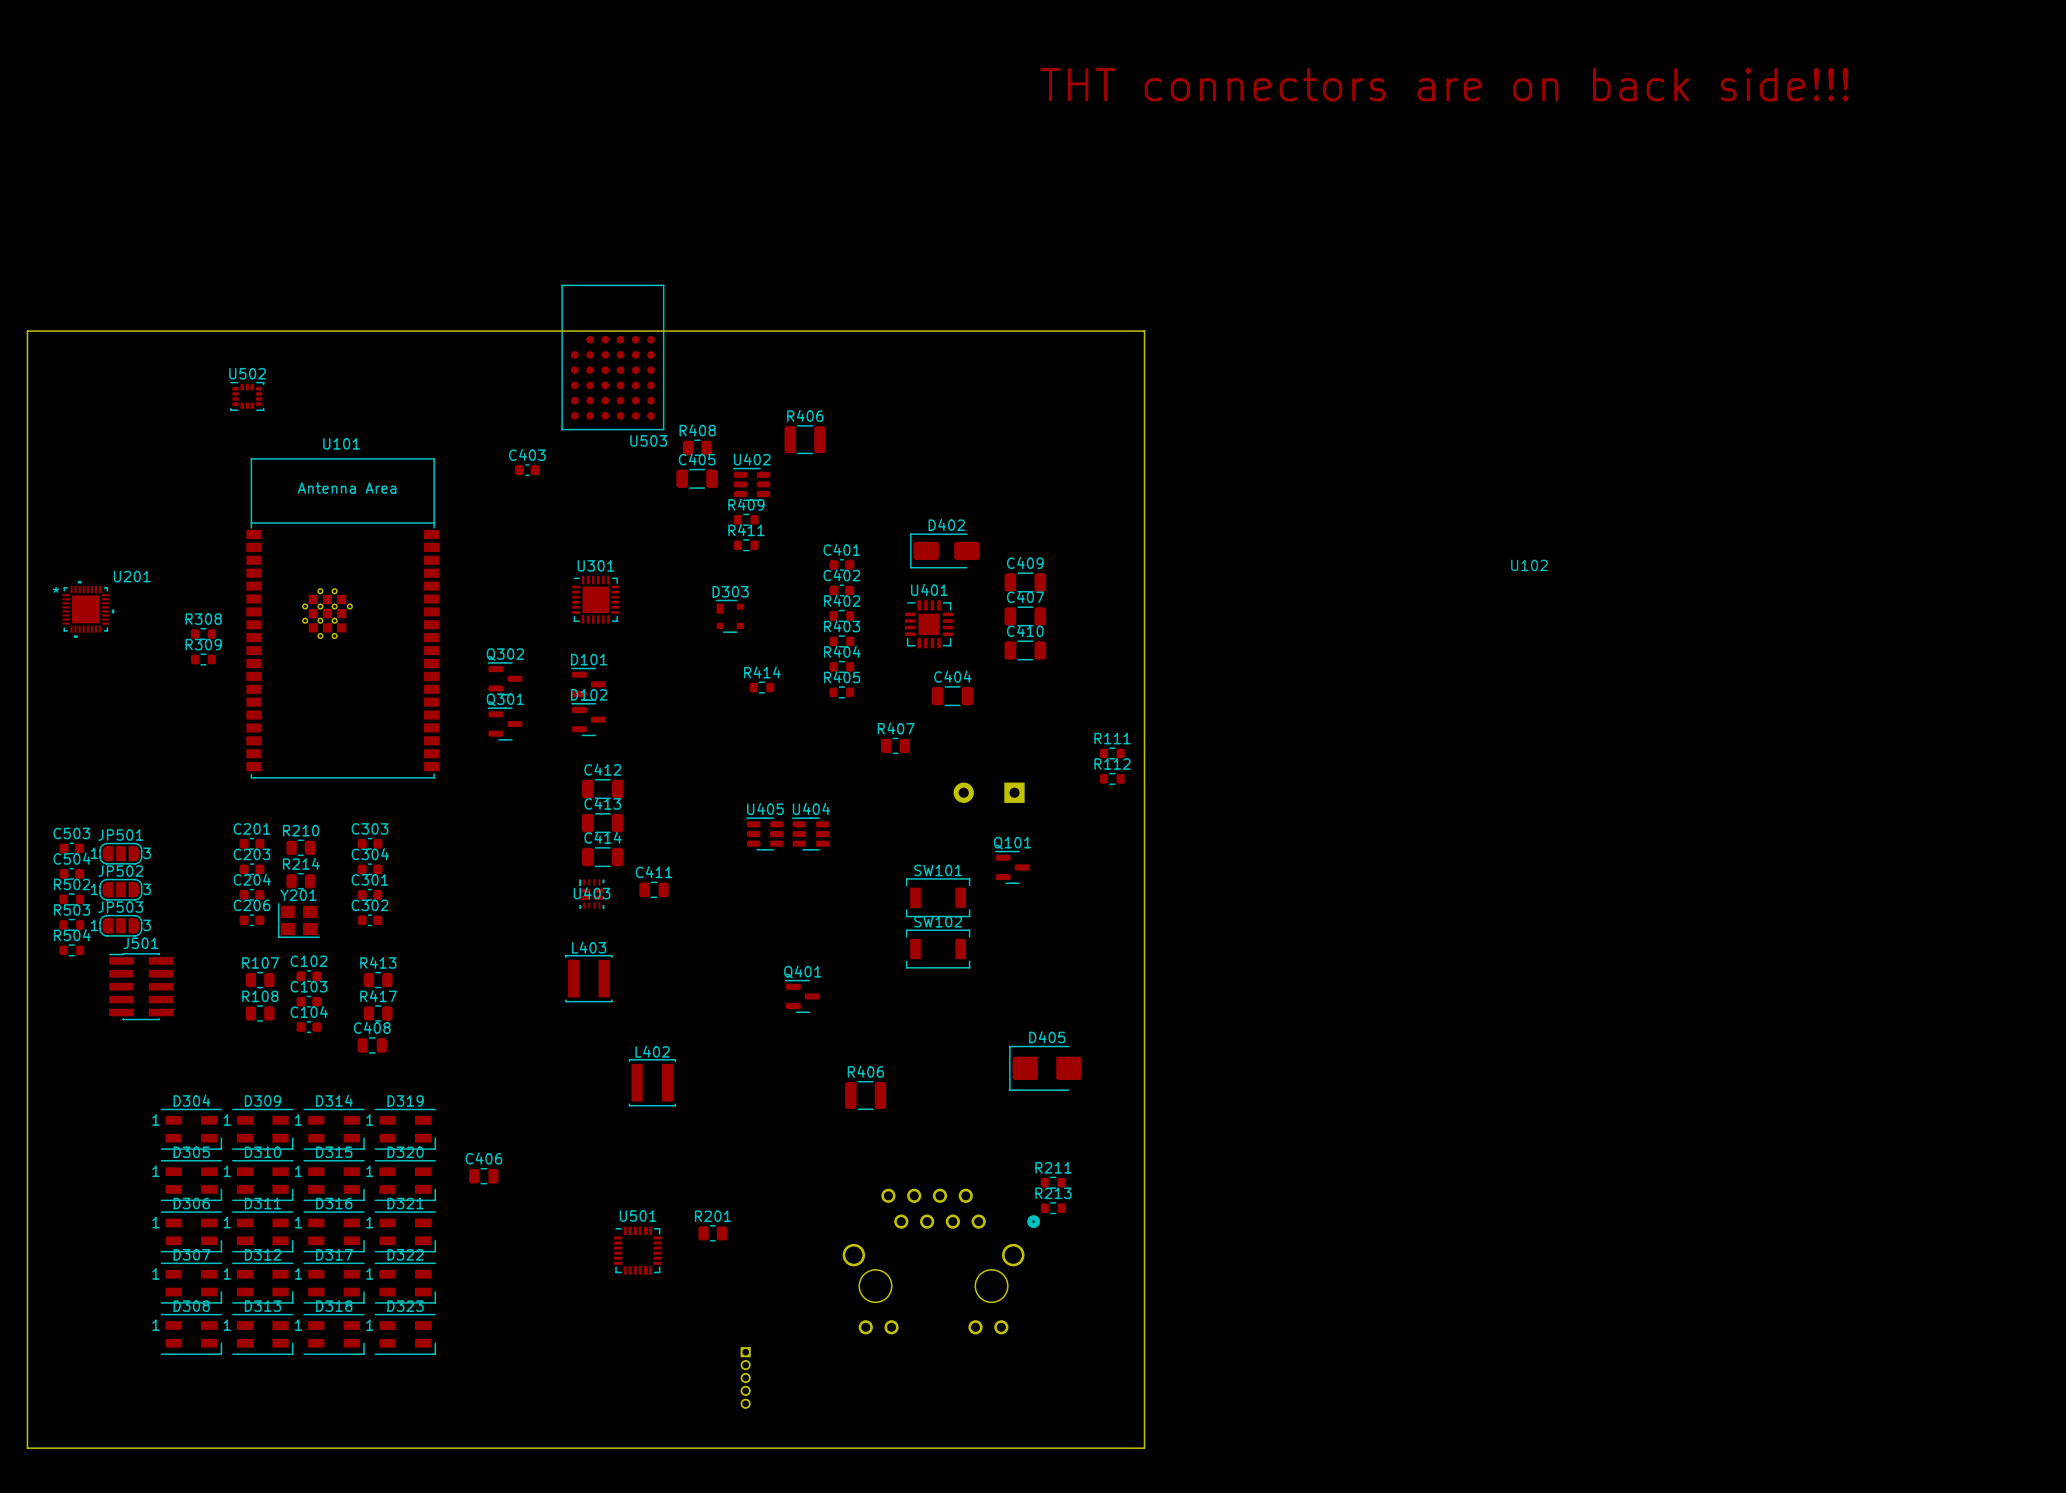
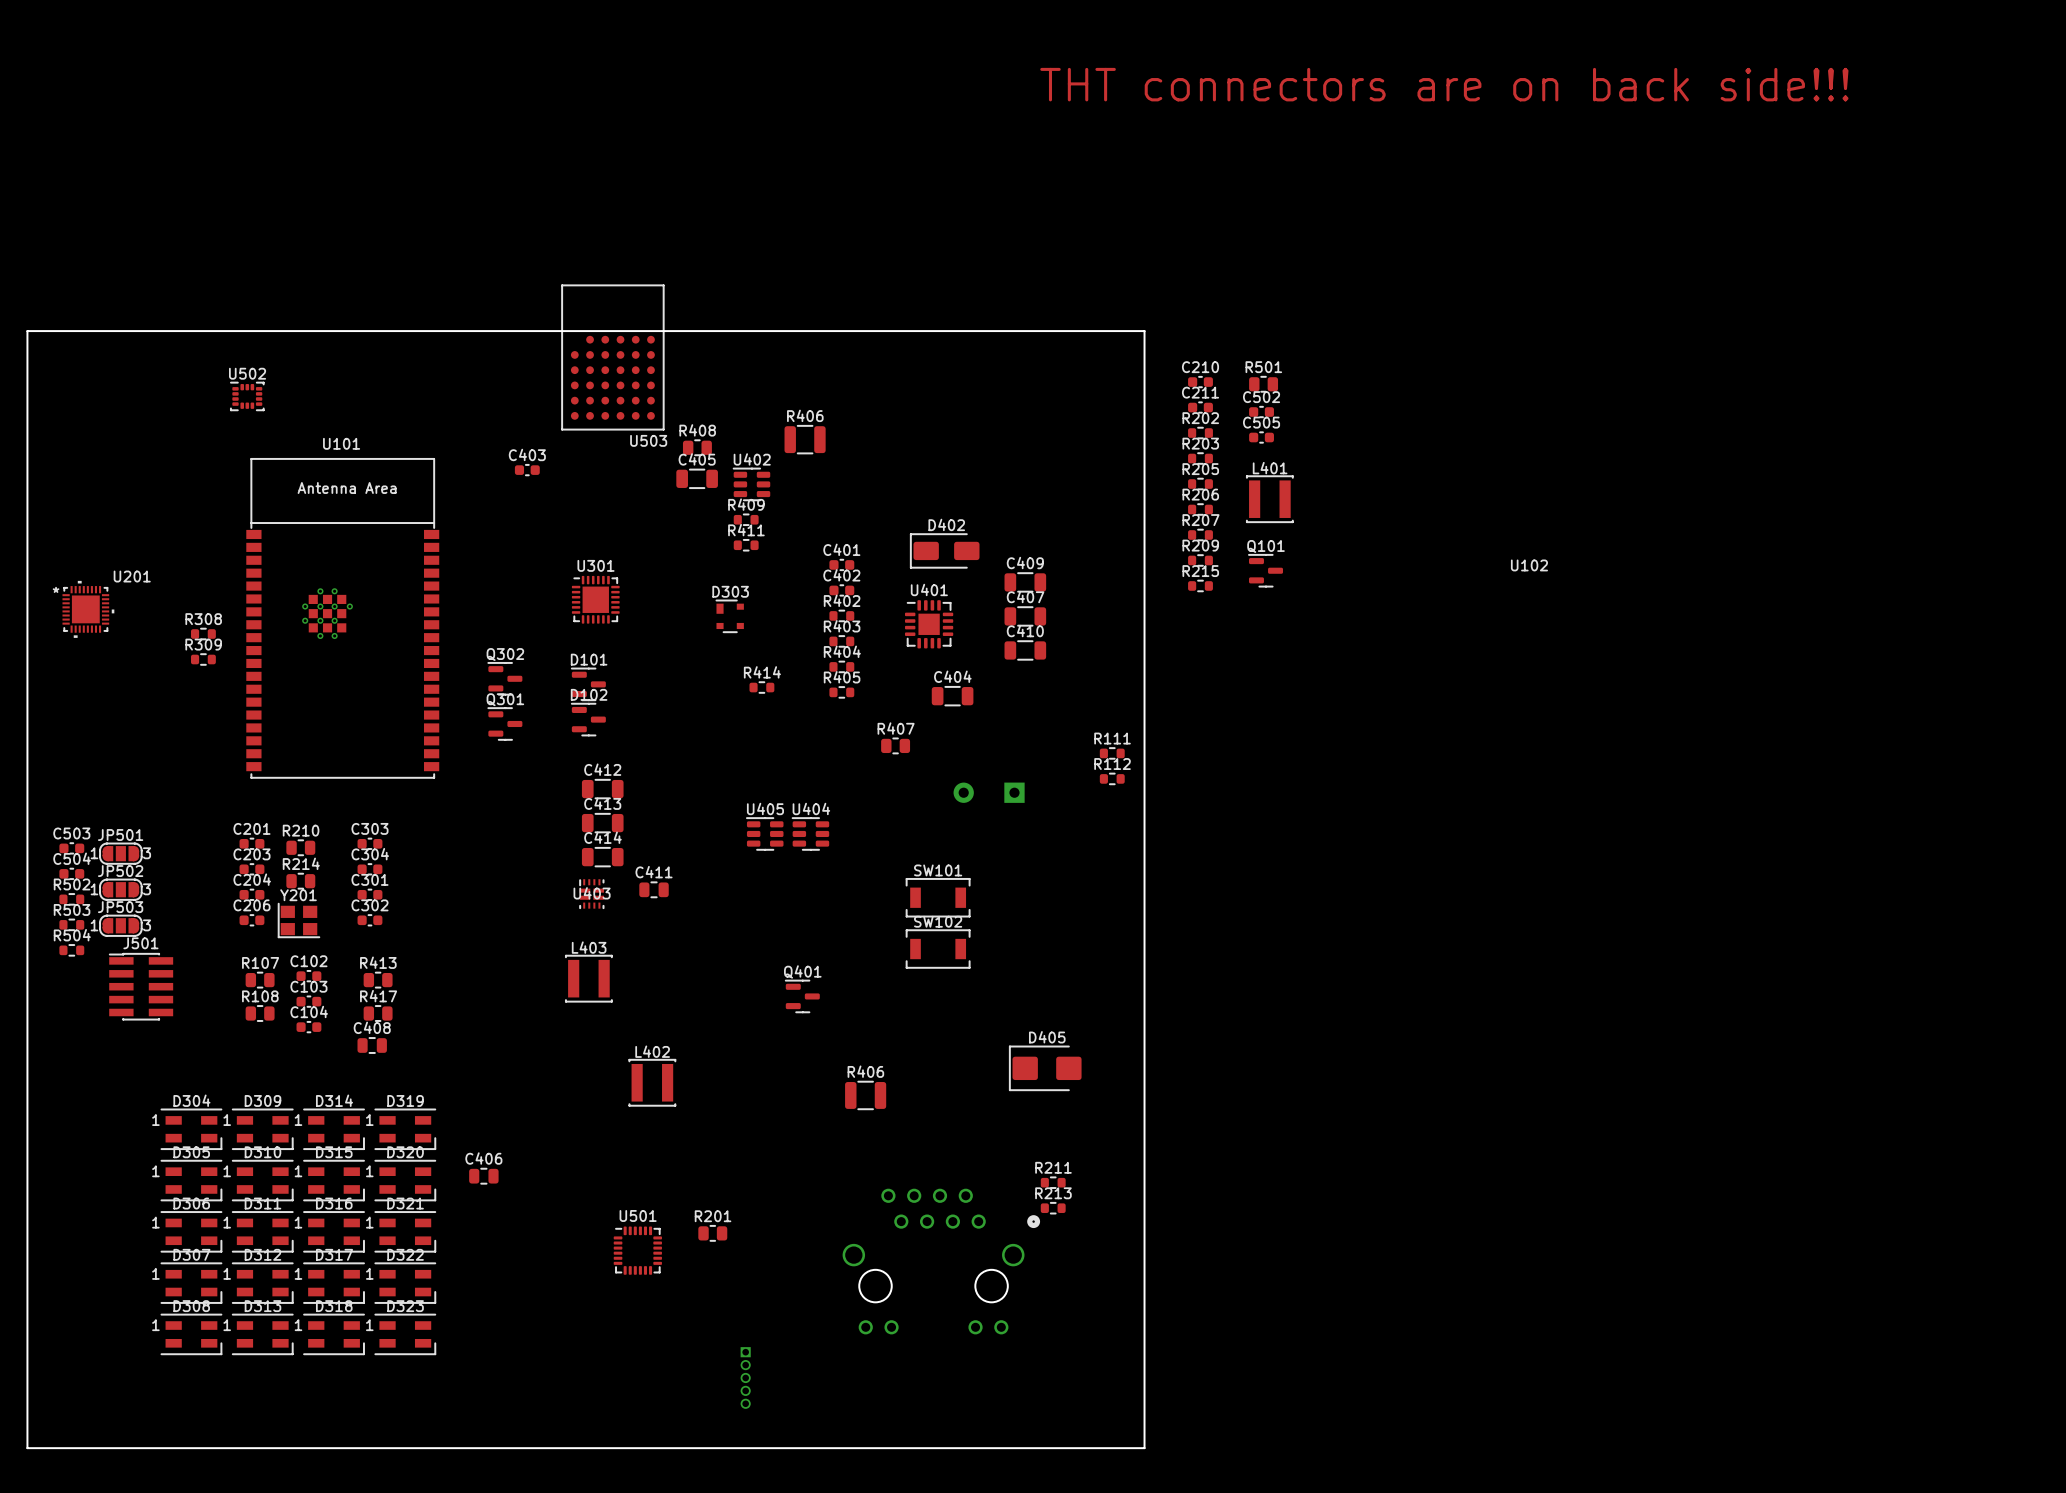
C210: none -> (1200, 382)
R501: none -> (1263, 384)
C211: none -> (1200, 407)
C502: none -> (1261, 412)
R202: none -> (1200, 433)
C505: none -> (1261, 437)
R203: none -> (1200, 458)
R205: none -> (1200, 484)
L401: none -> (1269, 499)
R206: none -> (1200, 509)
R207: none -> (1200, 534)
R209: none -> (1200, 560)
R215: none -> (1200, 585)
Q101 position: (1012, 867) -> (1265, 570)

